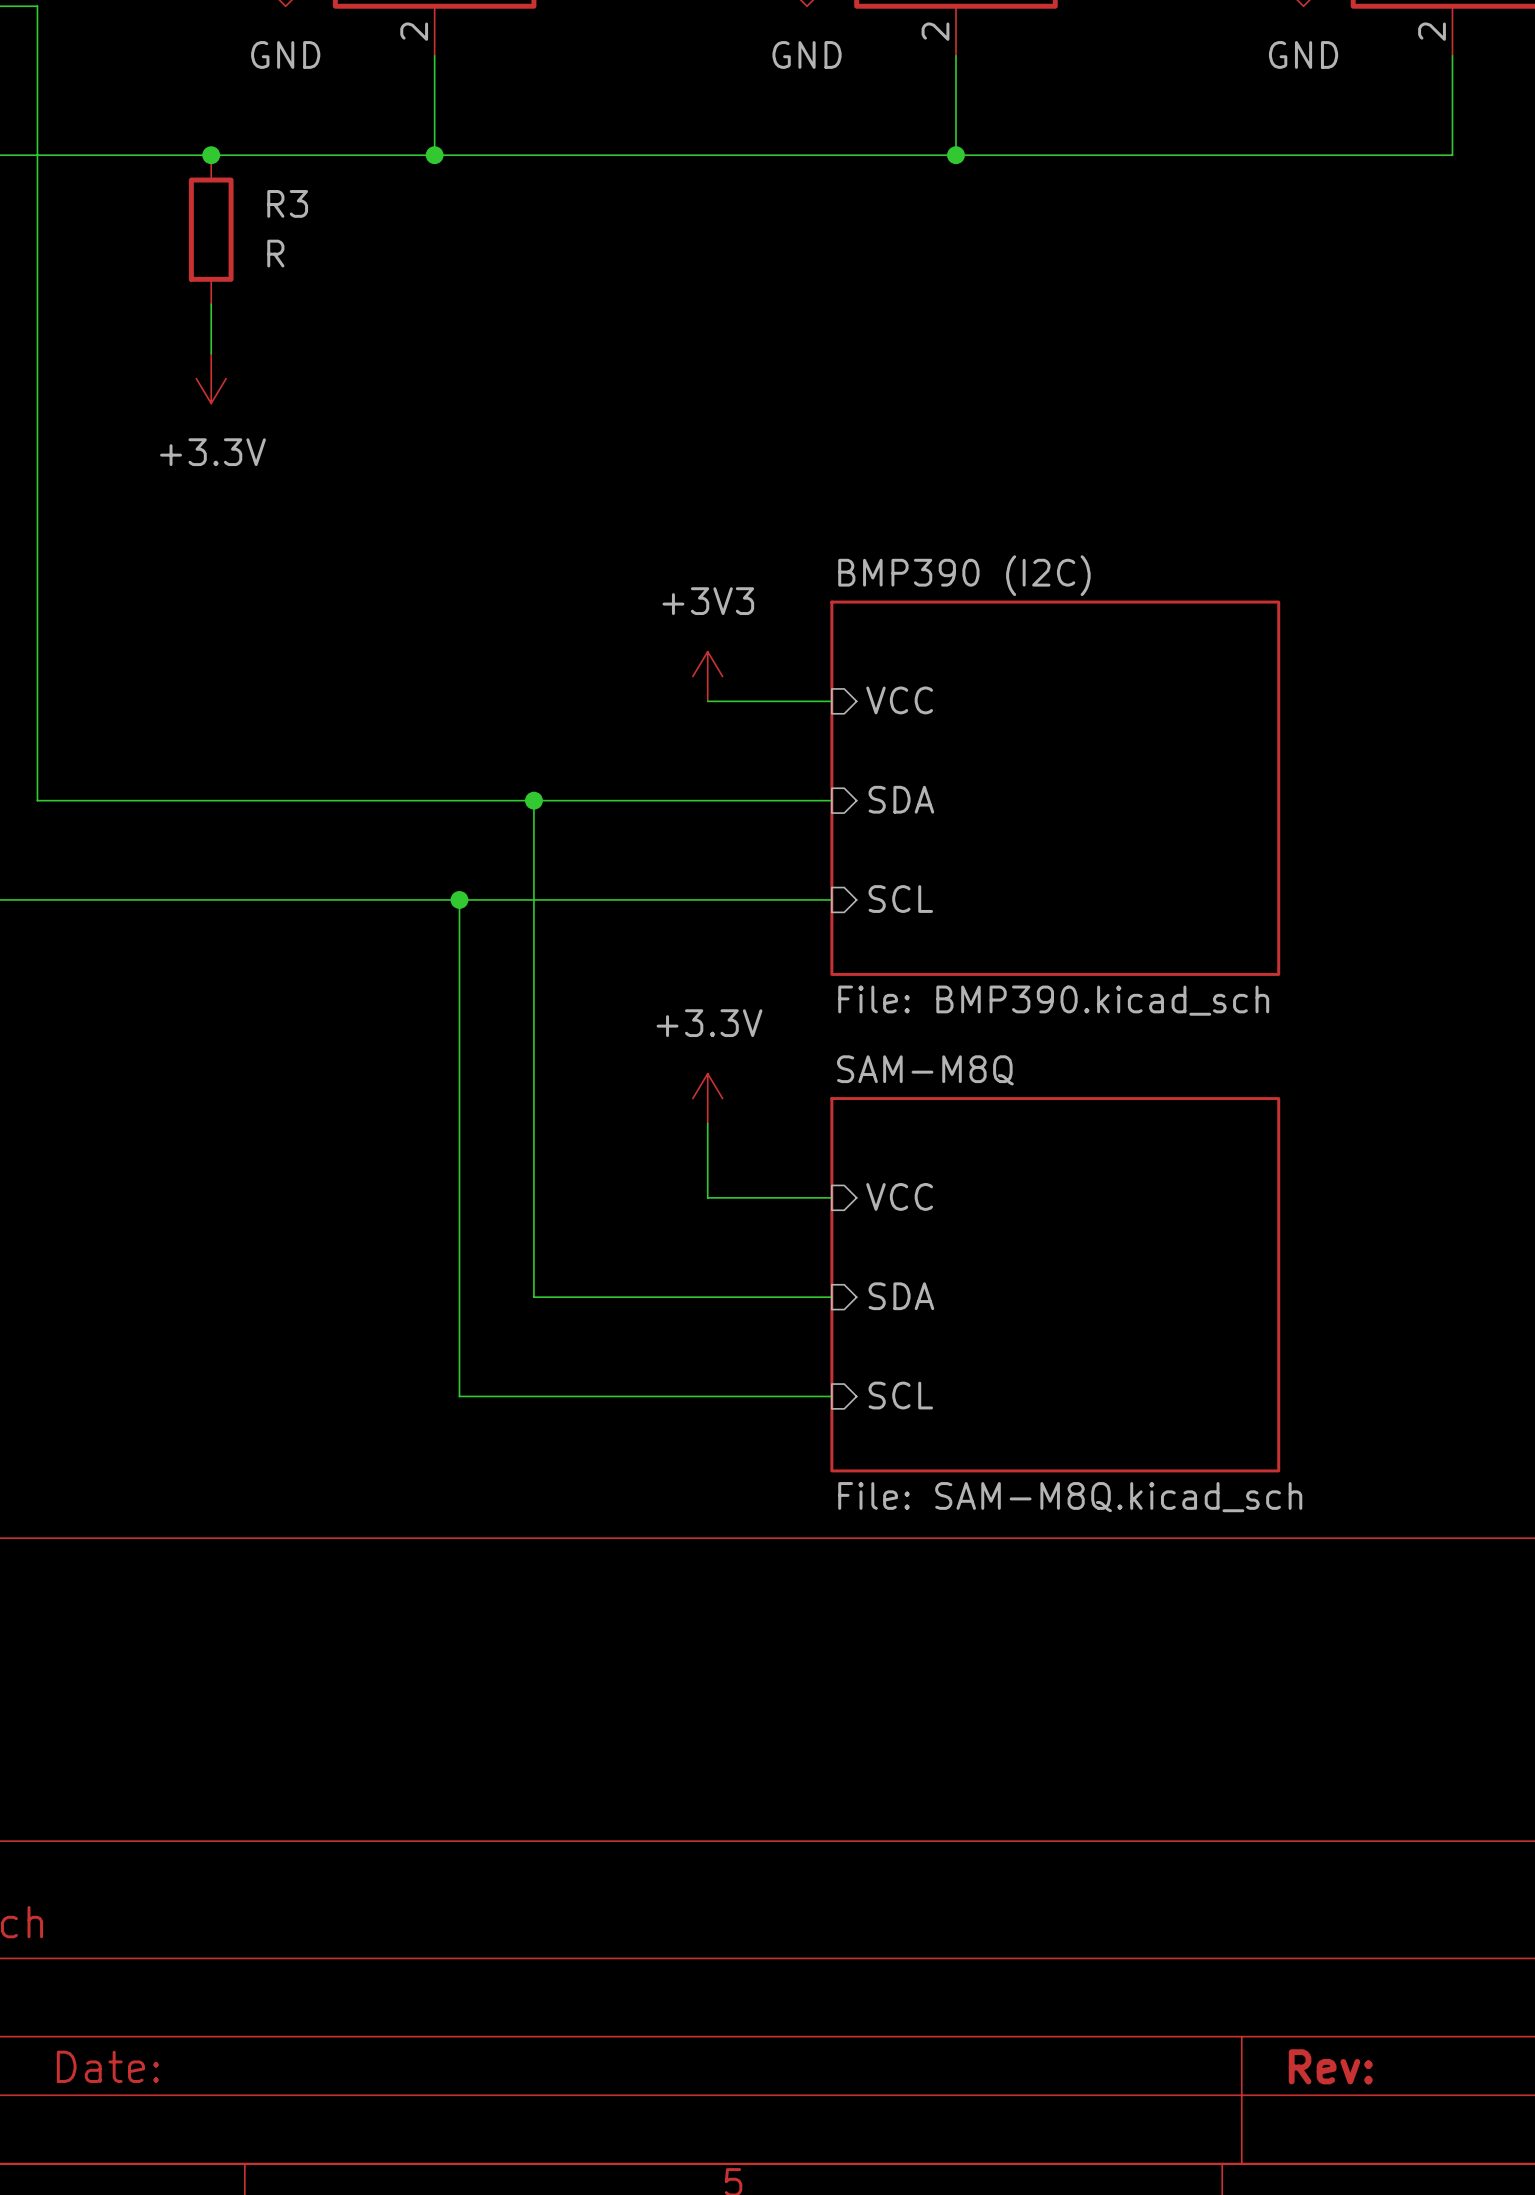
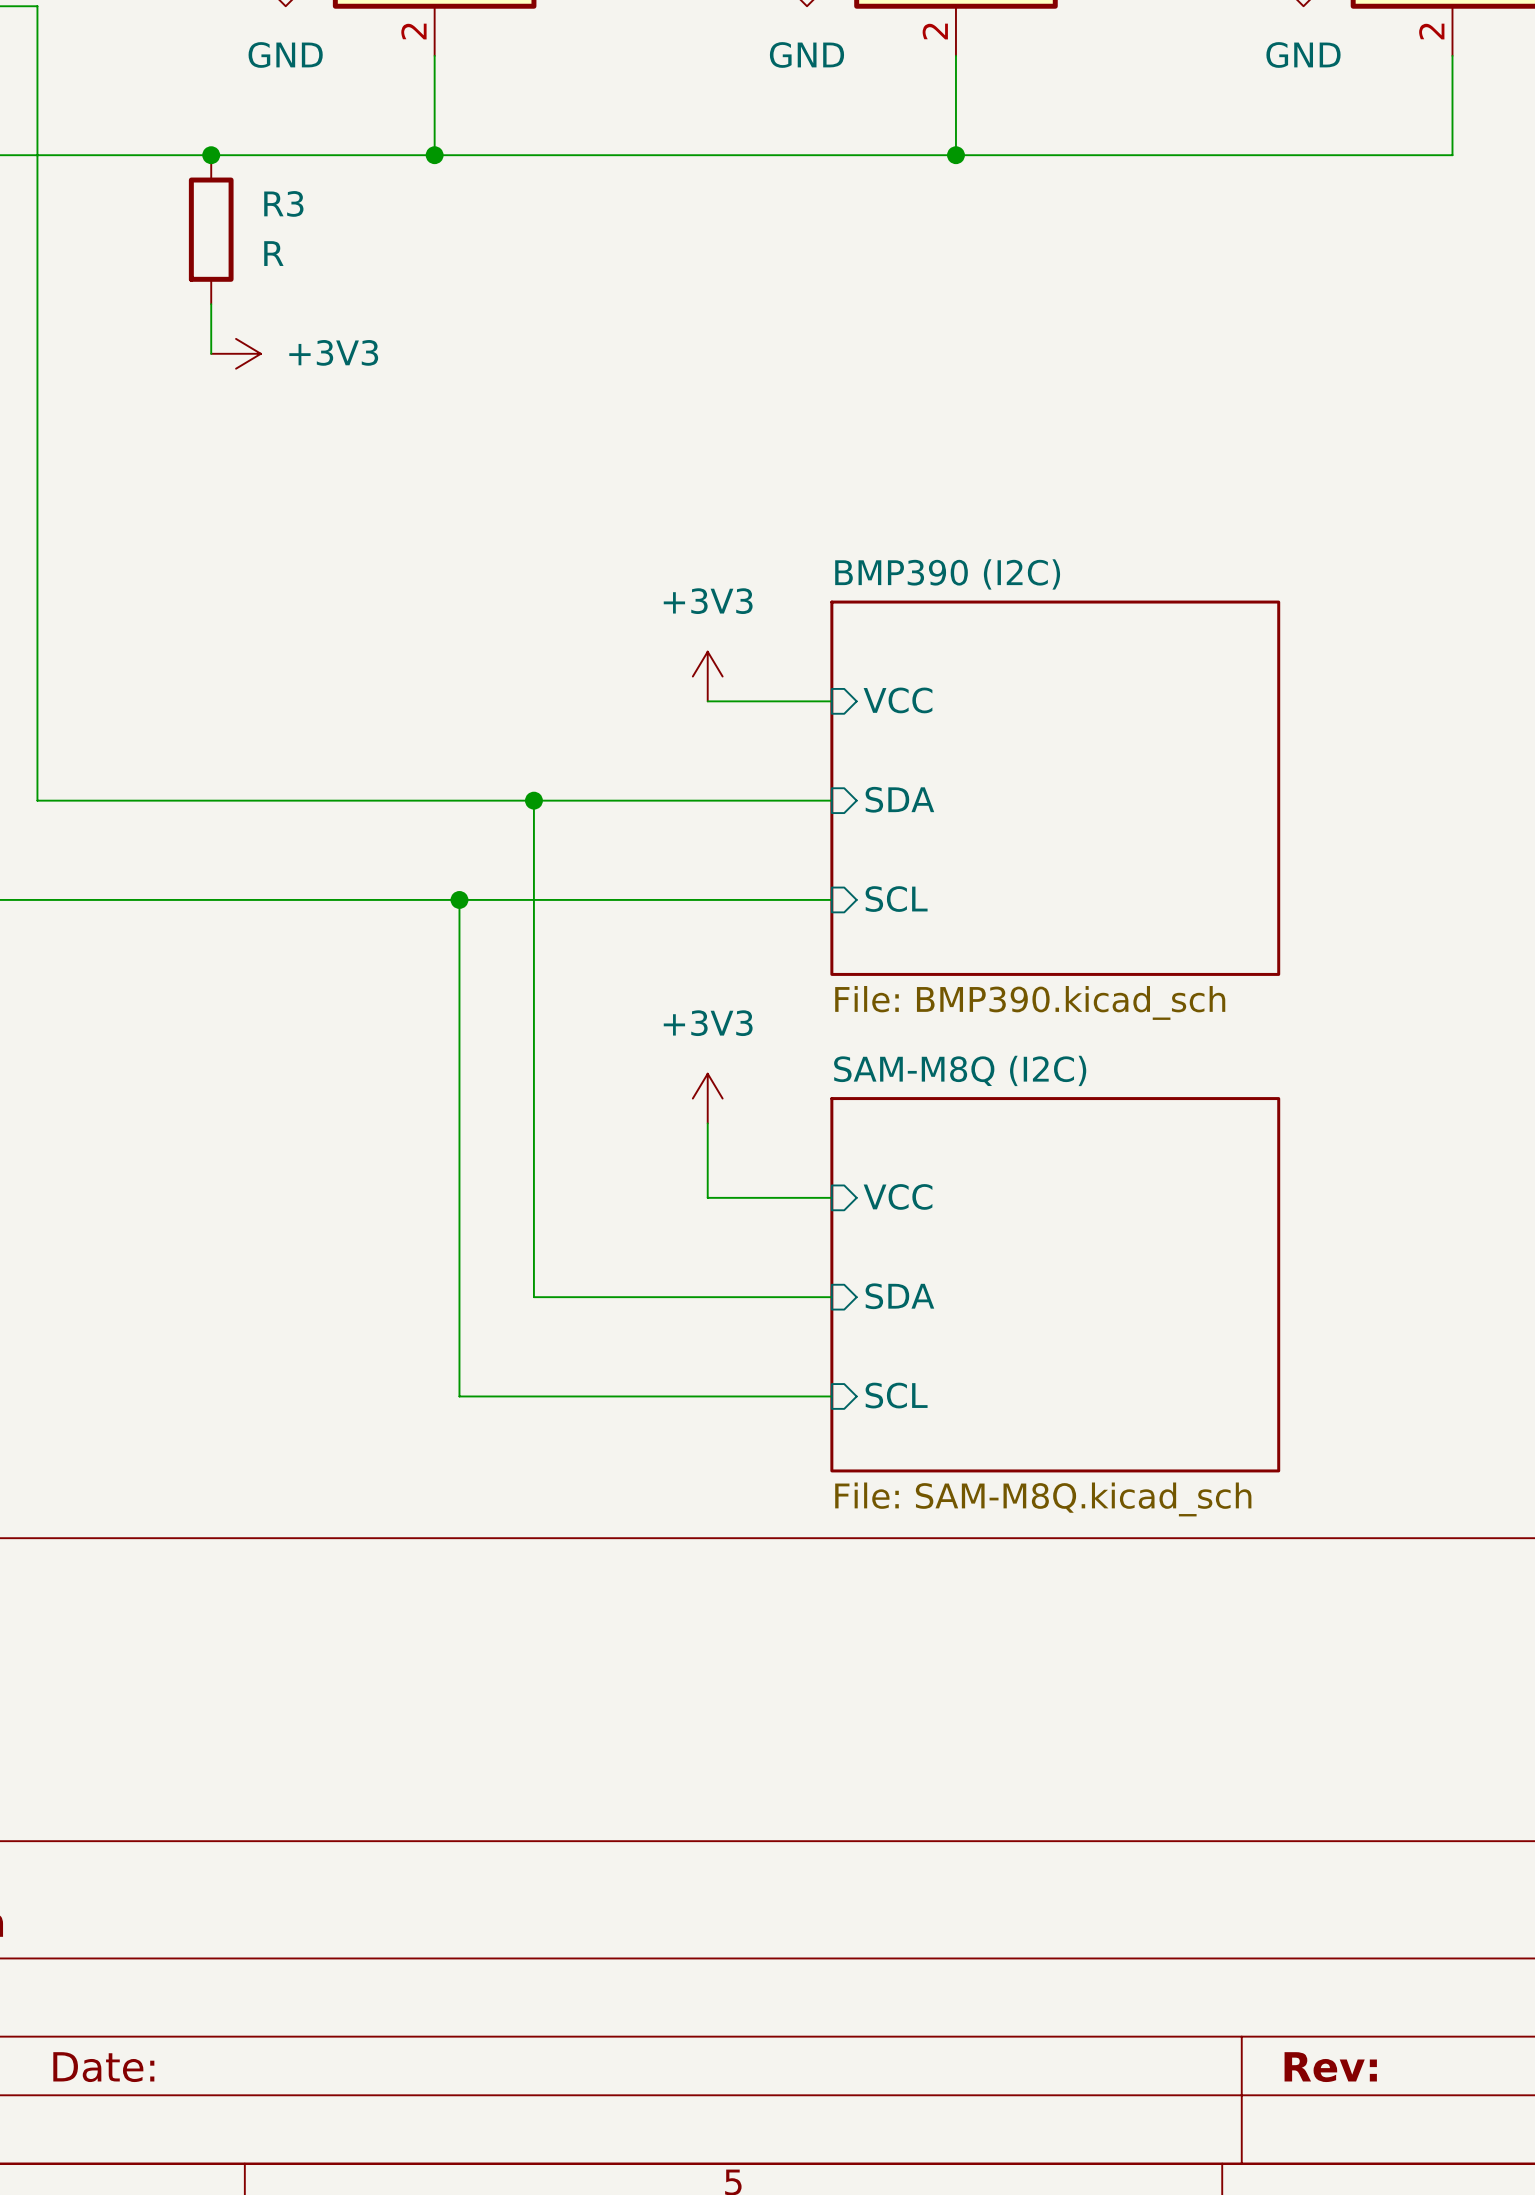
power symbol: none -> +3V3 (236, 353)
power symbol: +3.3V (211, 378) -> none
sheet SAM-M8Q name: SAM-M8Q (925, 1070) -> SAM-M8Q (I2C) (960, 1070)
power symbol: +3.3V (707, 1098) -> +3V3 (707, 1098)

